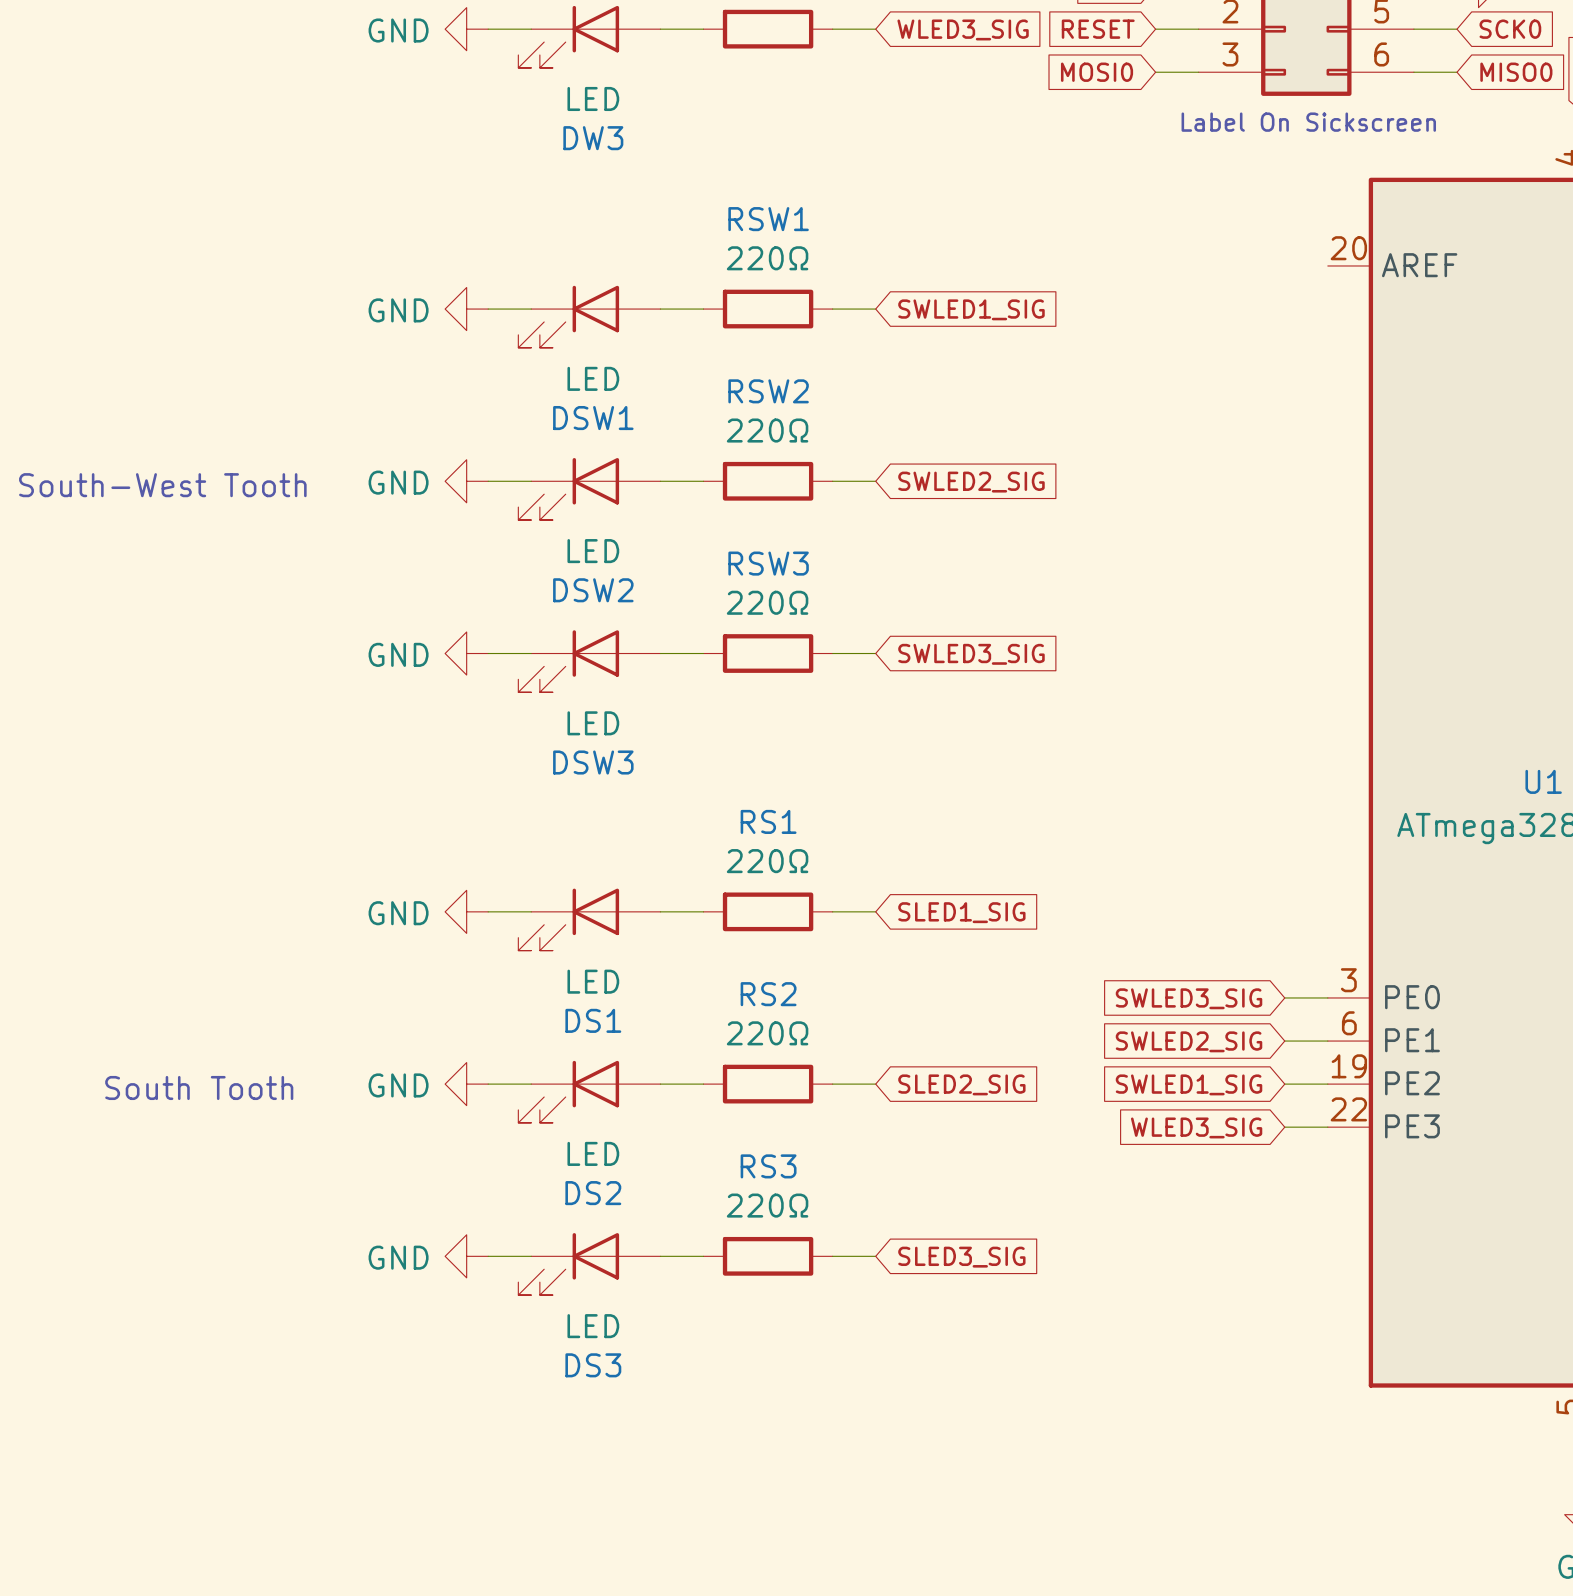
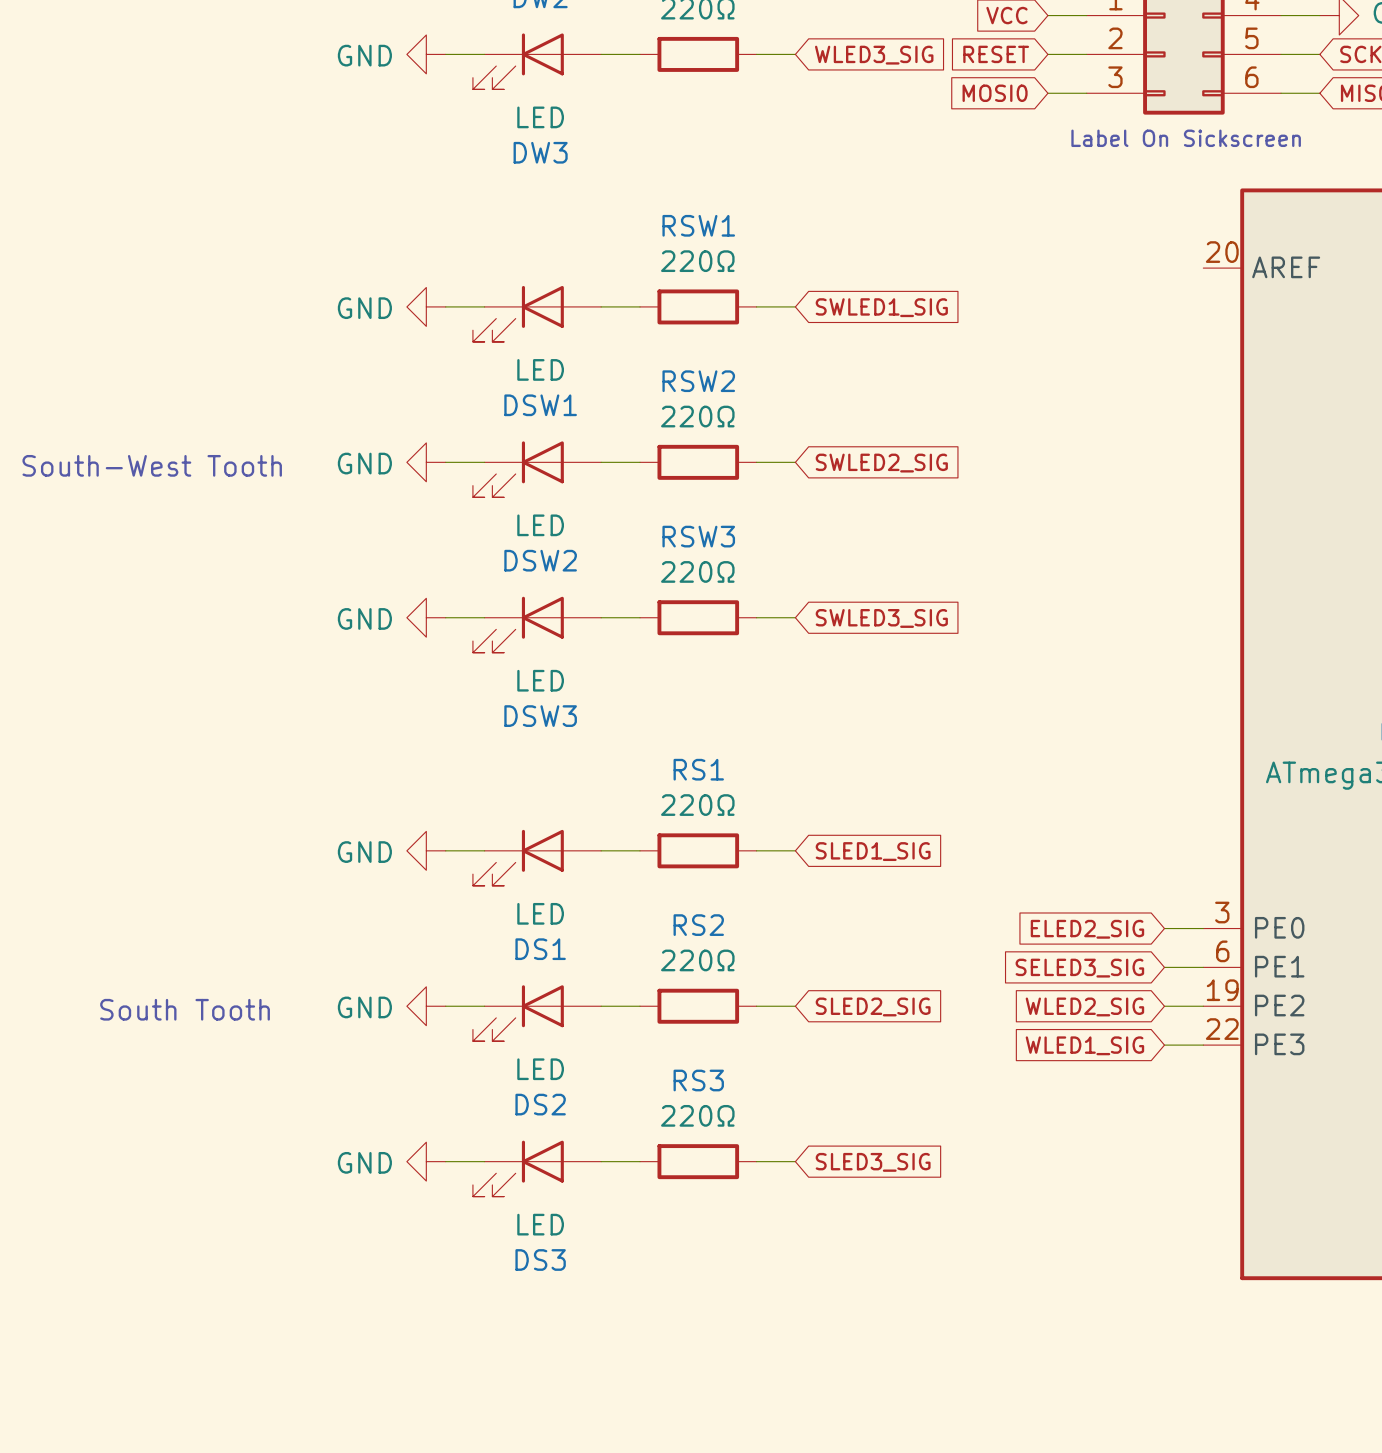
global label: SWLED3_SIG (1189, 998) -> ELED2_SIG (1087, 929)
global label: SWLED2_SIG (1189, 1041) -> SELED3_SIG (1079, 968)
global label: SWLED1_SIG (1189, 1084) -> WLED2_SIG (1084, 1006)
global label: WLED3_SIG (1196, 1127) -> WLED1_SIG (1084, 1045)

